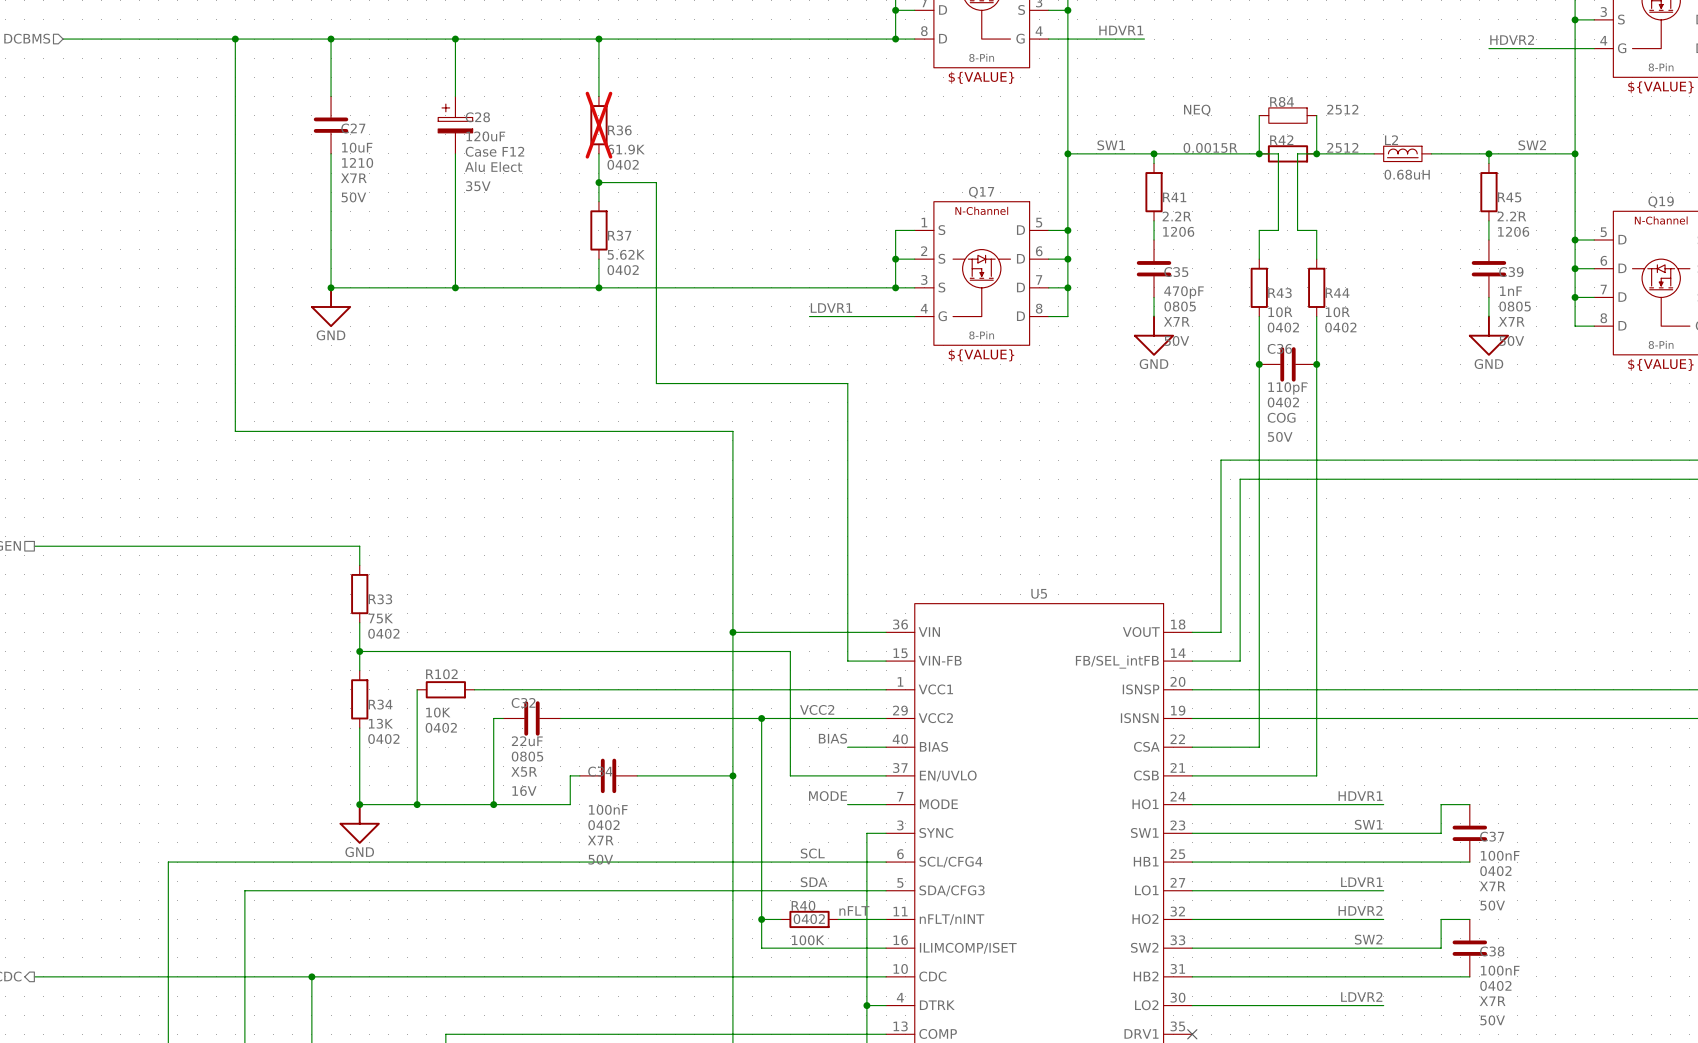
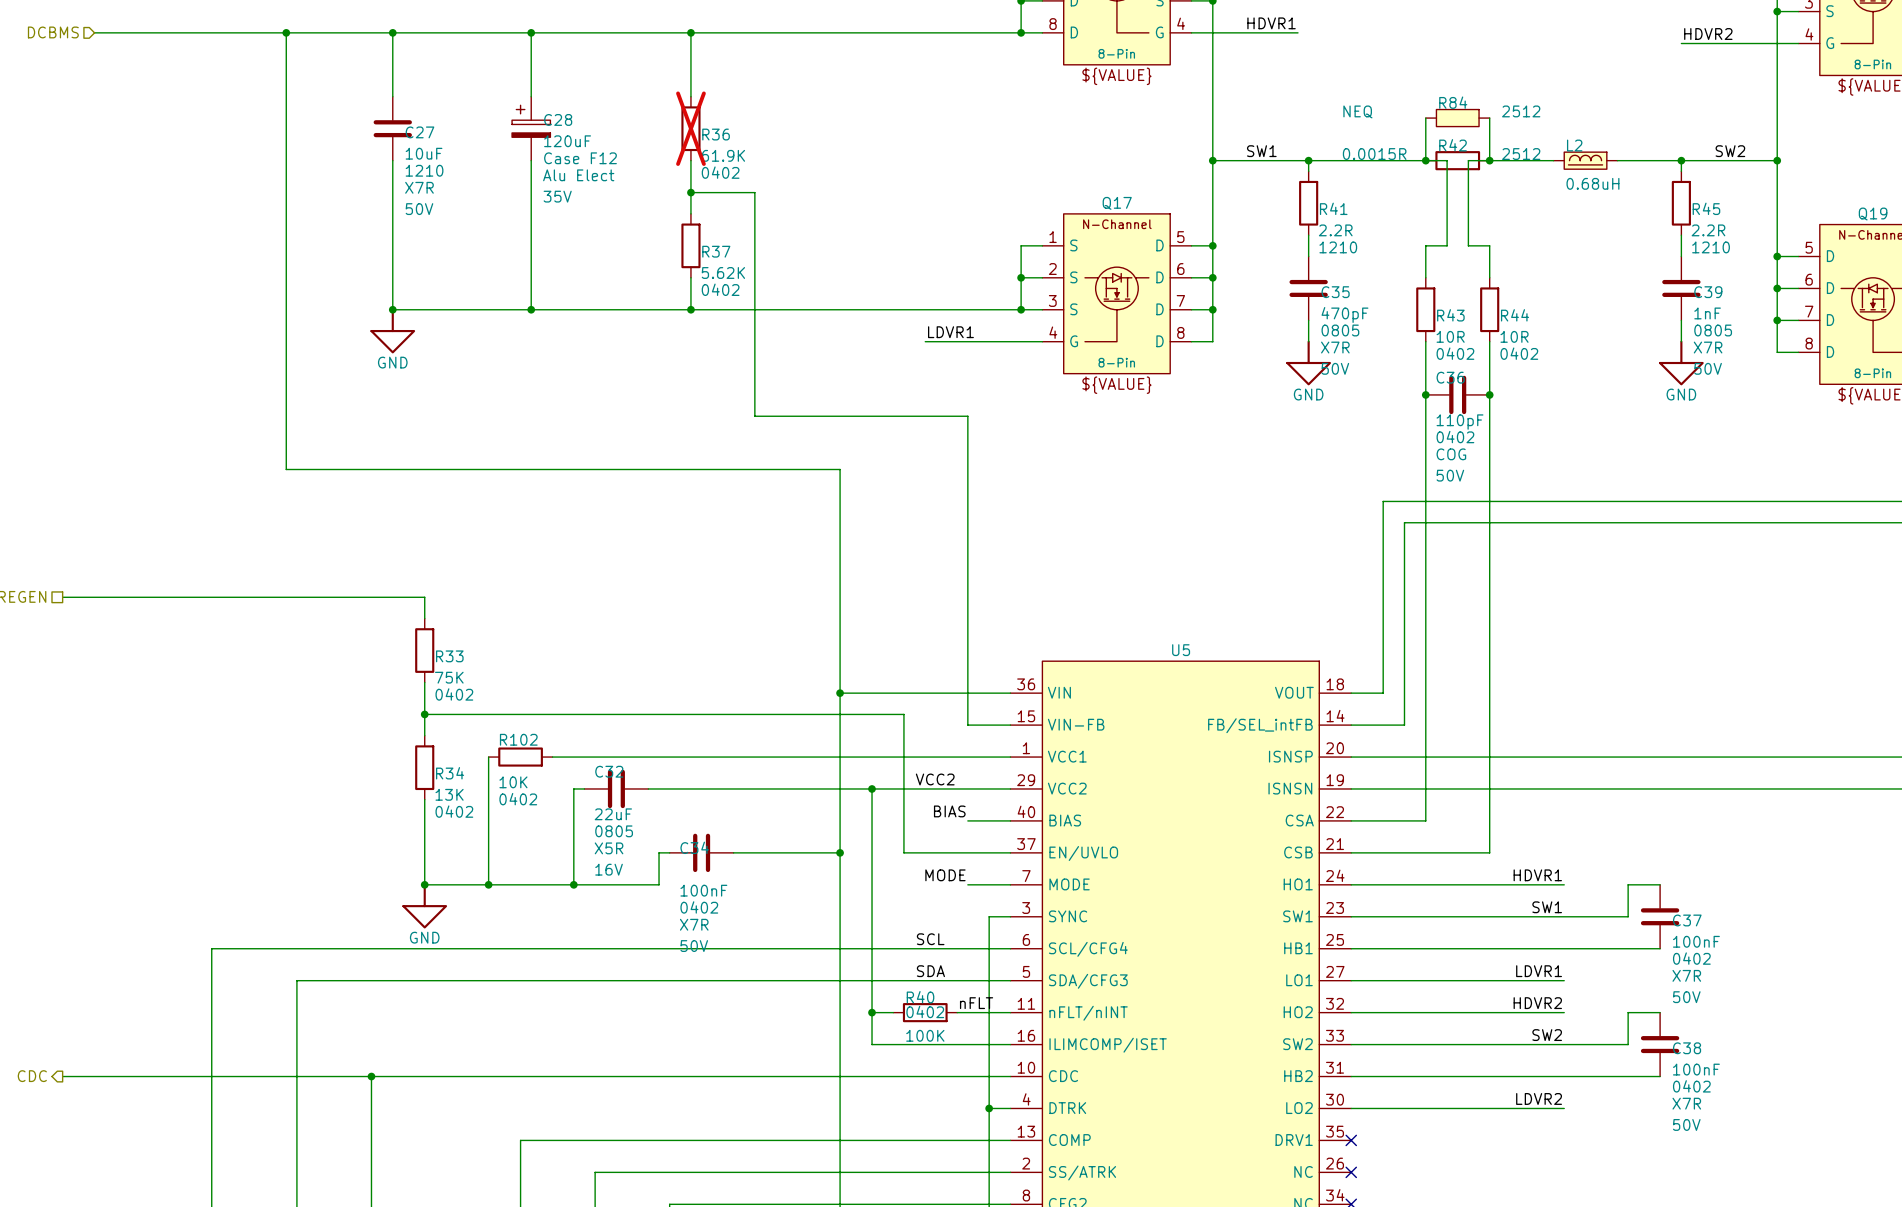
R41 text: 1206 (1178, 231) -> 1210 (1338, 247)
R45 text: 1206 (1513, 231) -> 1210 (1711, 247)

